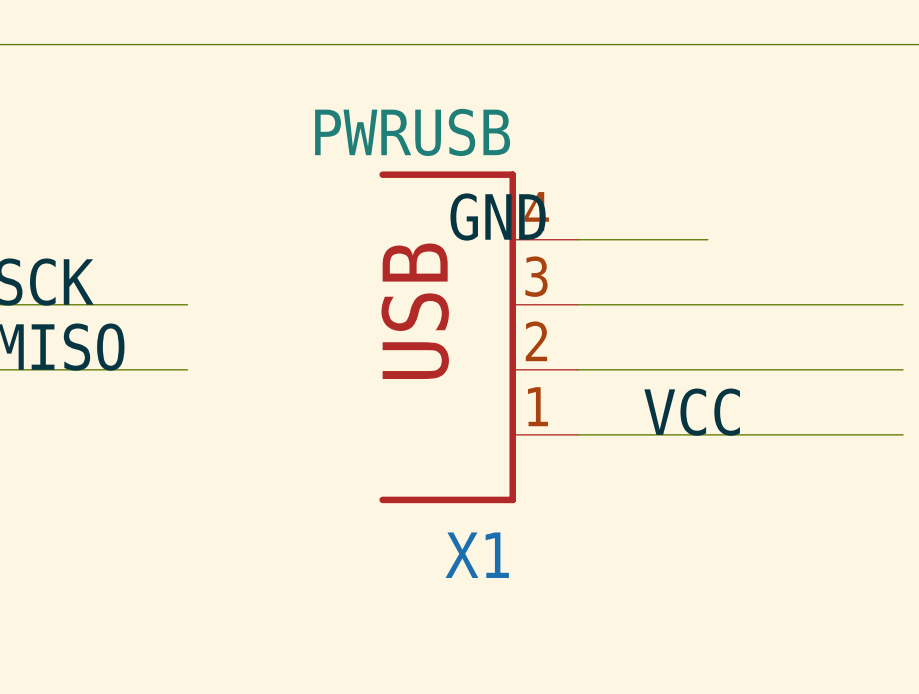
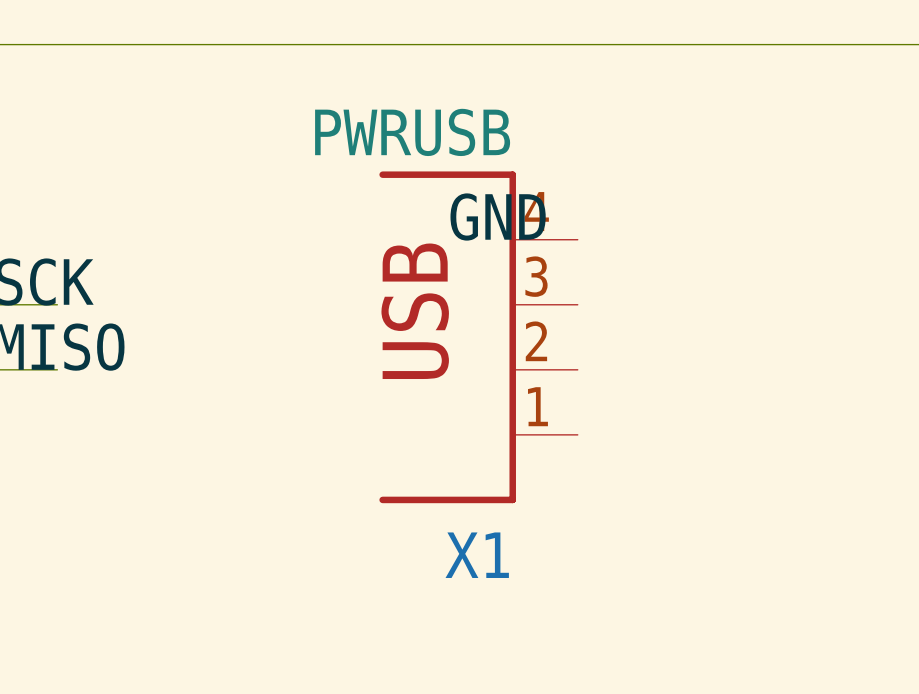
wire: (577, 239) (707, 239) -> none
wire: (57, 304) (187, 304) -> none
wire: (577, 304) (903, 304) -> none
wire: (57, 369) (187, 369) -> none
wire: (577, 369) (903, 369) -> none
label: VCC (692, 412) -> none
wire: (577, 434) (903, 434) -> none

